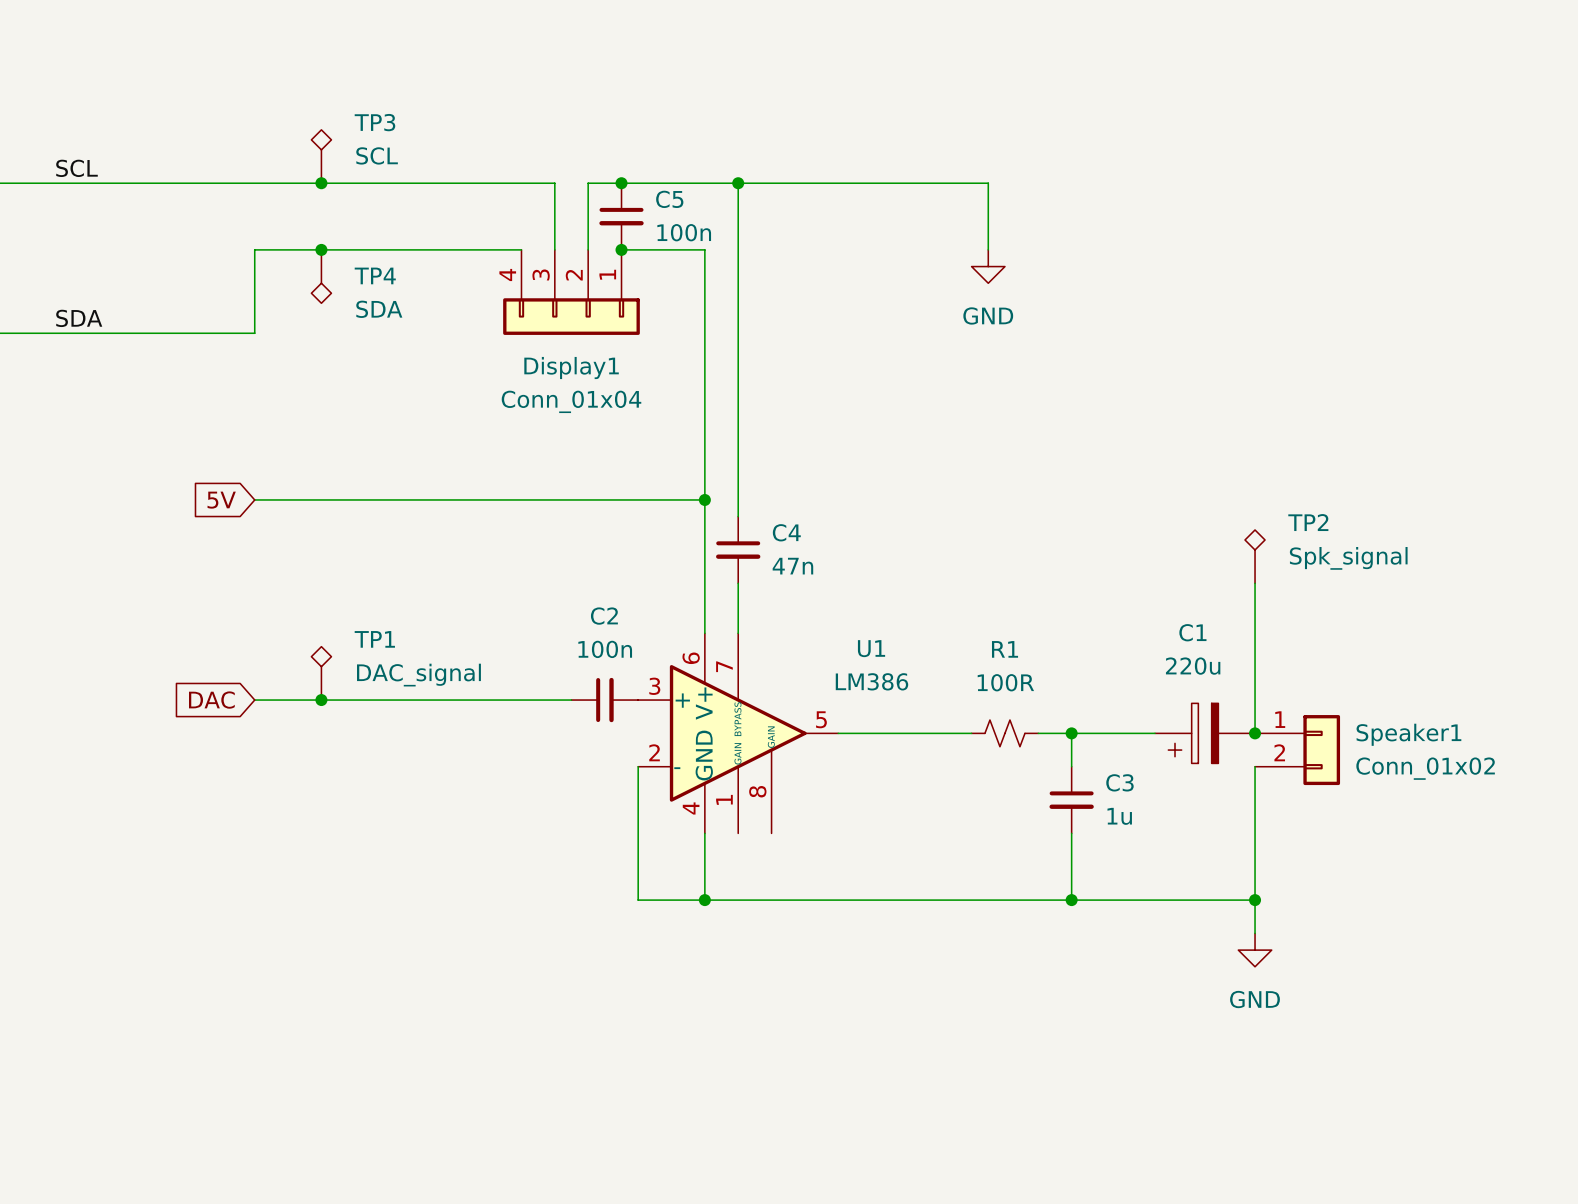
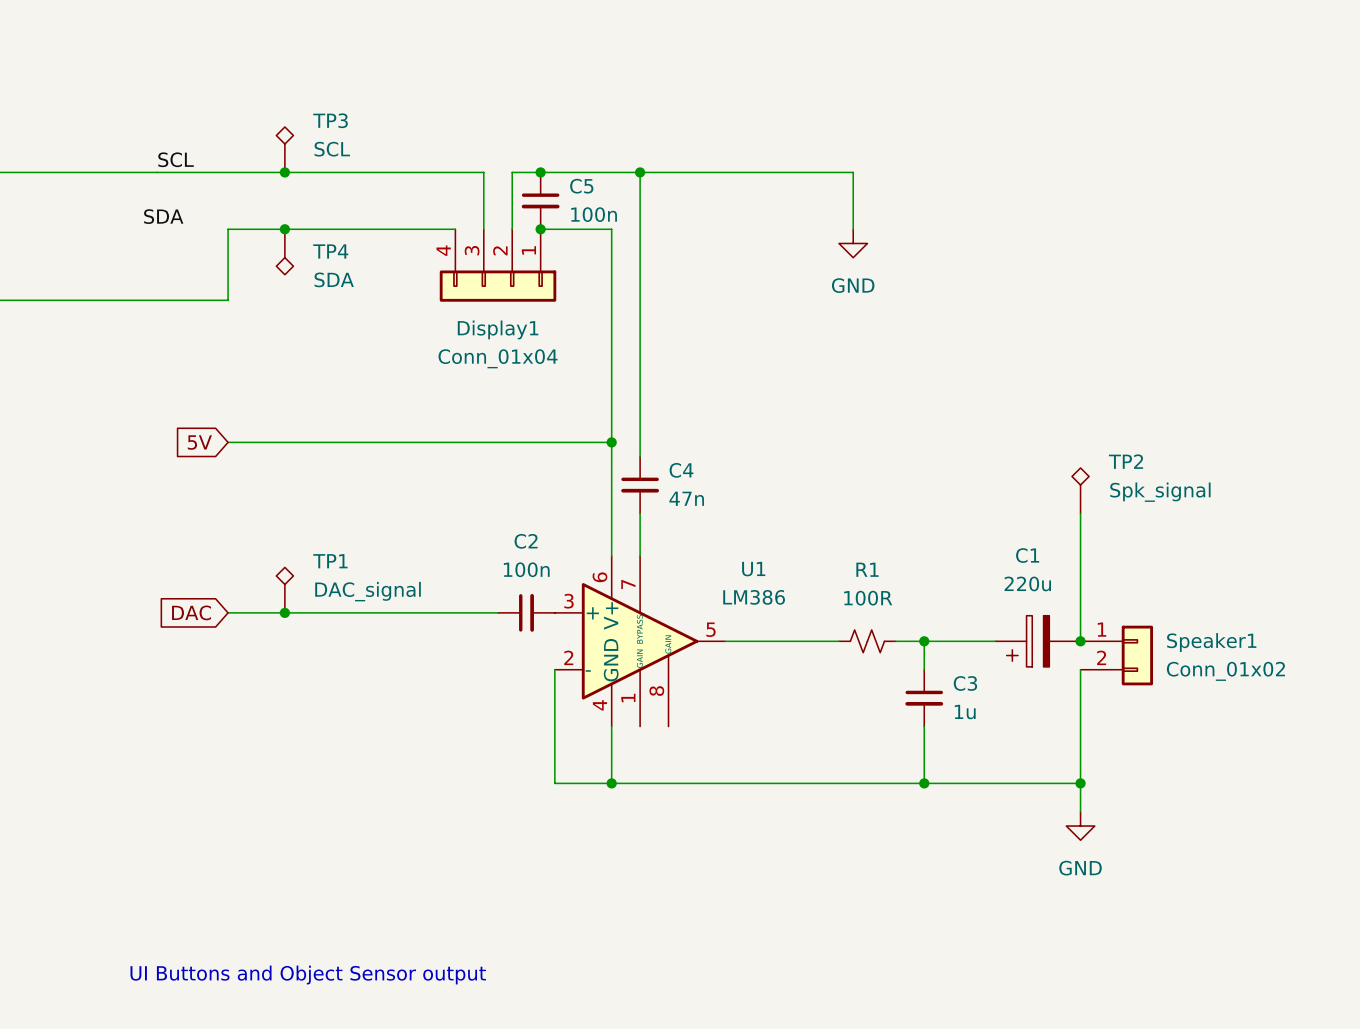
label position: SCL (76, 168) -> SCL (176, 159)
label position: SDA (79, 318) -> SDA (163, 216)
text: none -> UI Buttons and Object Sensor output (308, 975)

